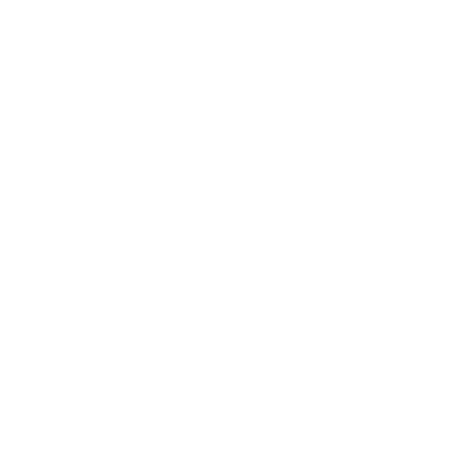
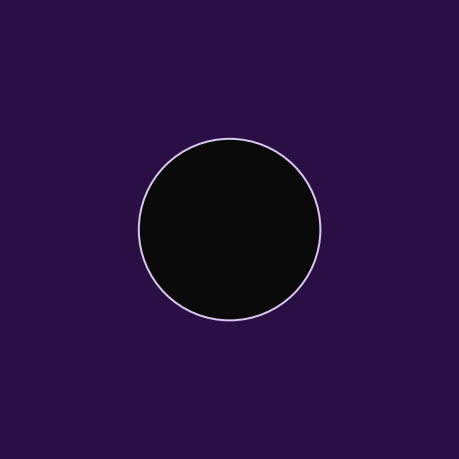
hole: none -> (229, 229)

